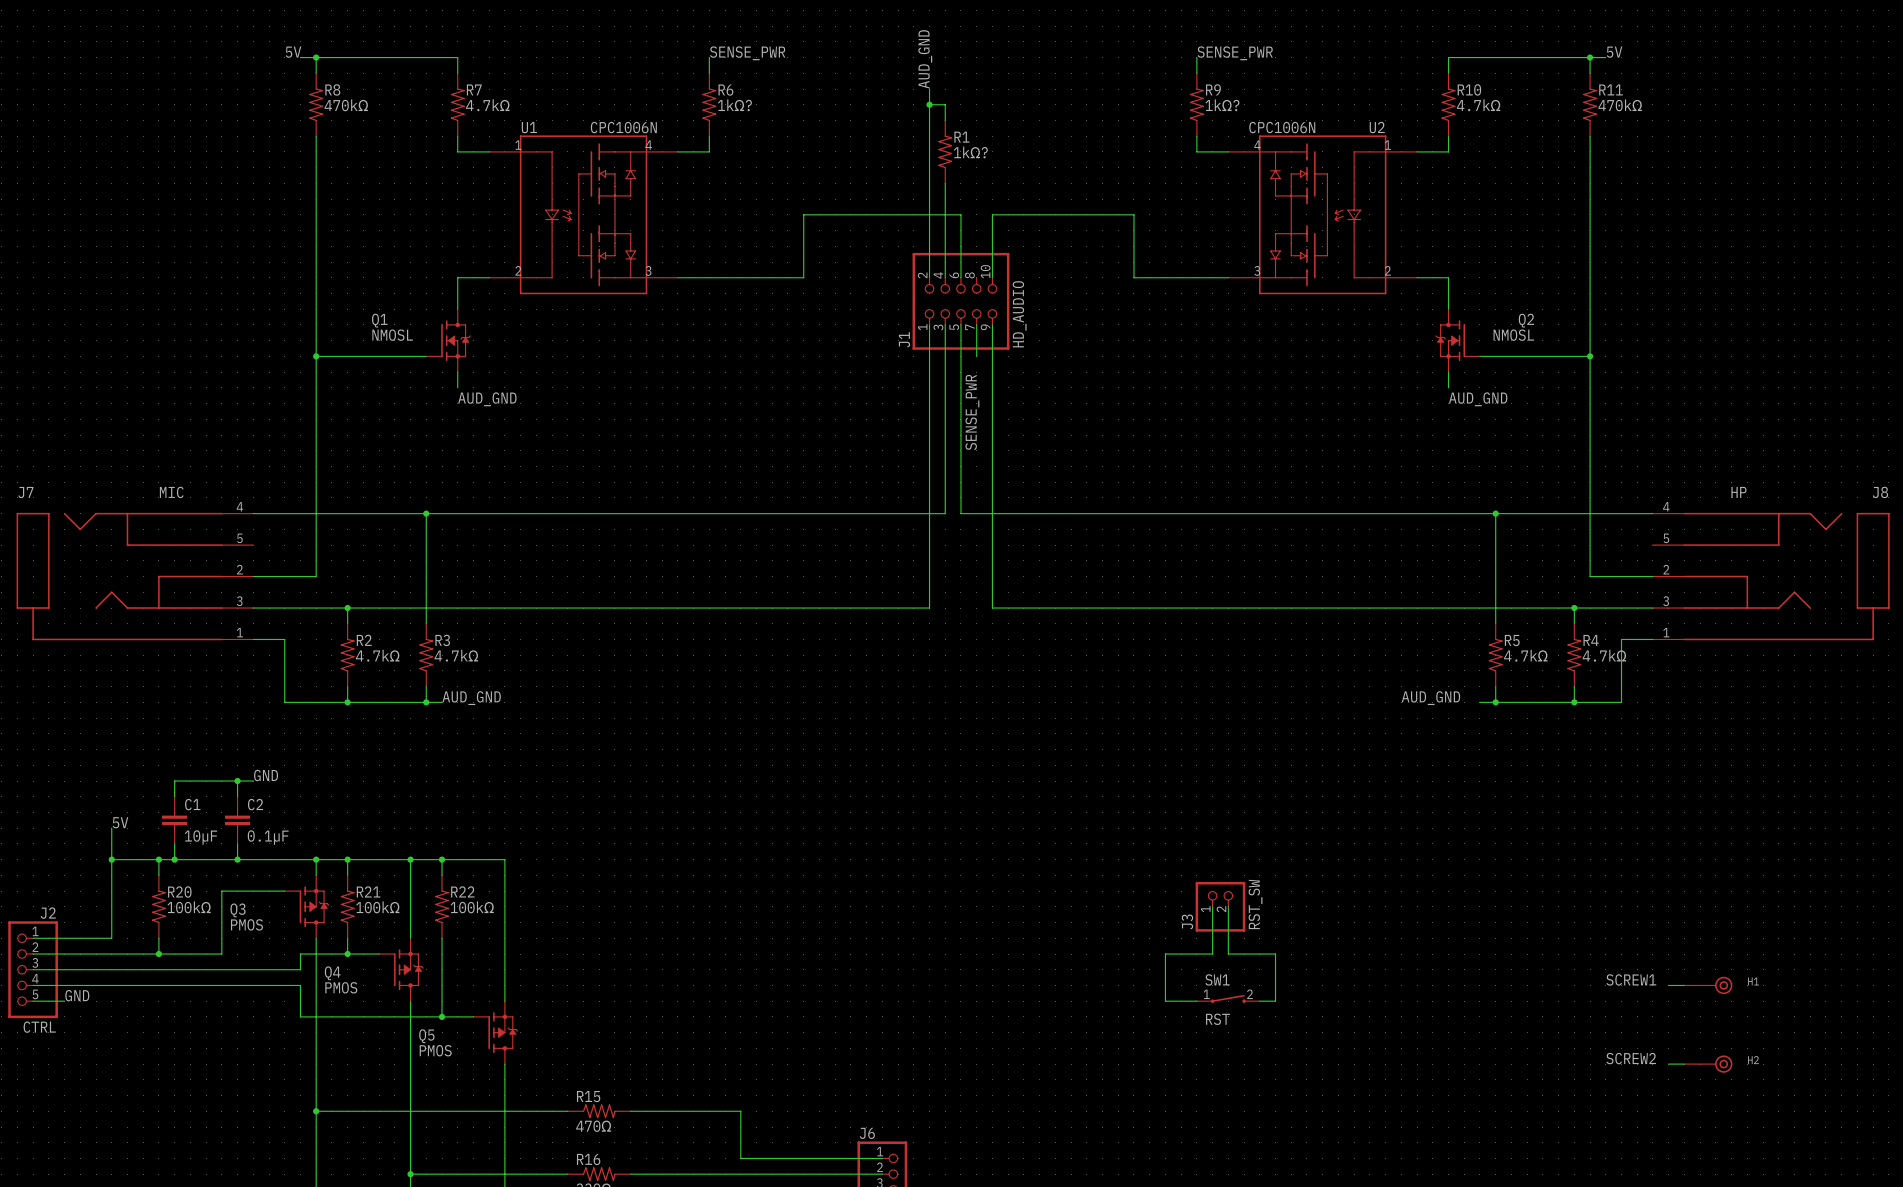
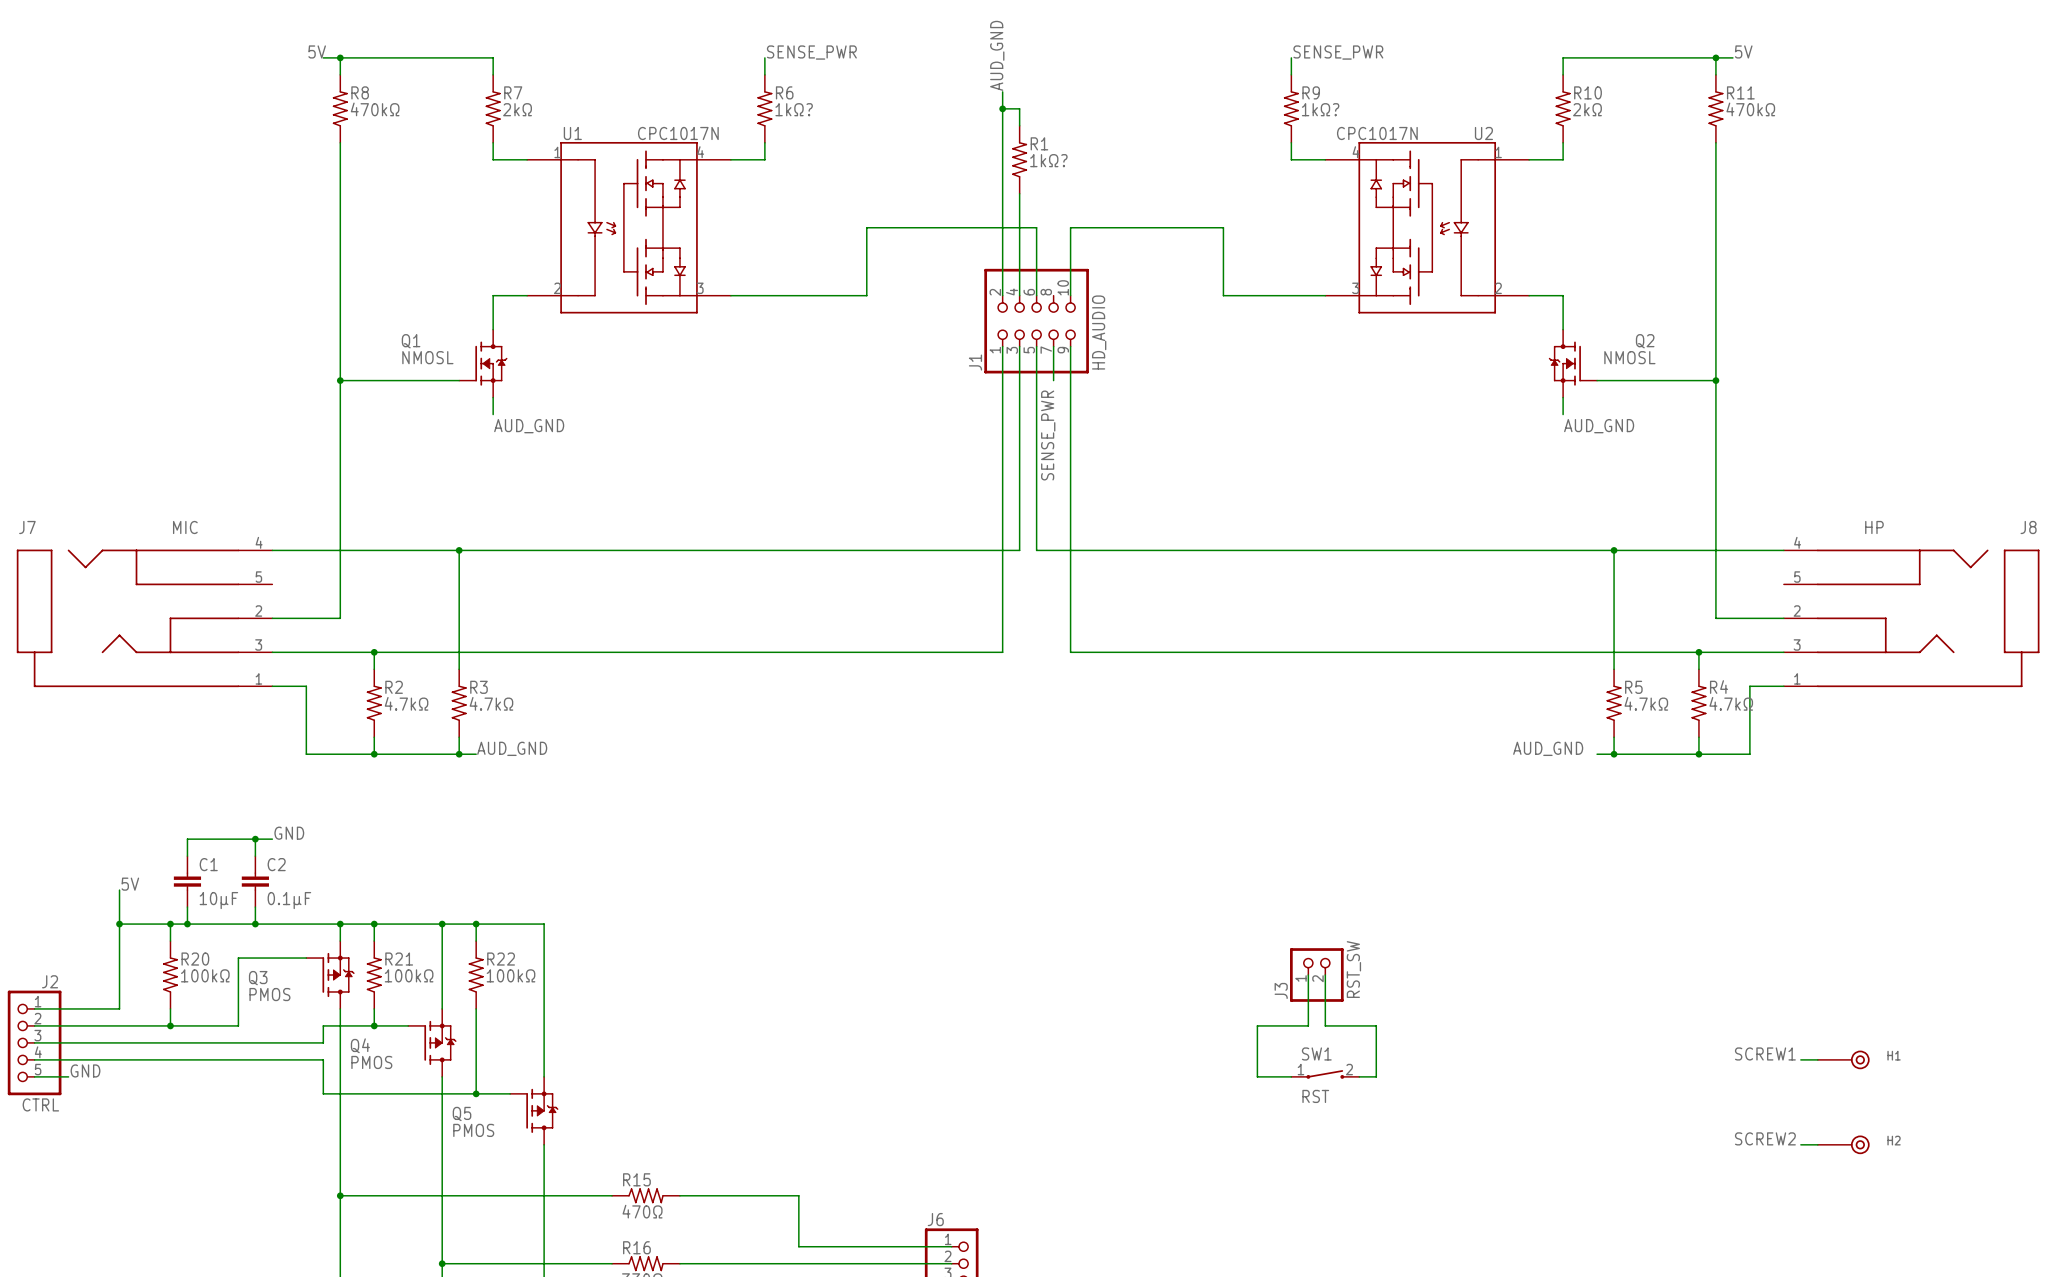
R7 value: 4.7kΩ (487, 105) -> 2kΩ (517, 109)
R10 value: 4.7kΩ (1478, 105) -> 2kΩ (1587, 109)
U1 value: CPC1006N (623, 127) -> CPC1017N (678, 133)
U2 value: CPC1006N (1282, 127) -> CPC1017N (1377, 133)

